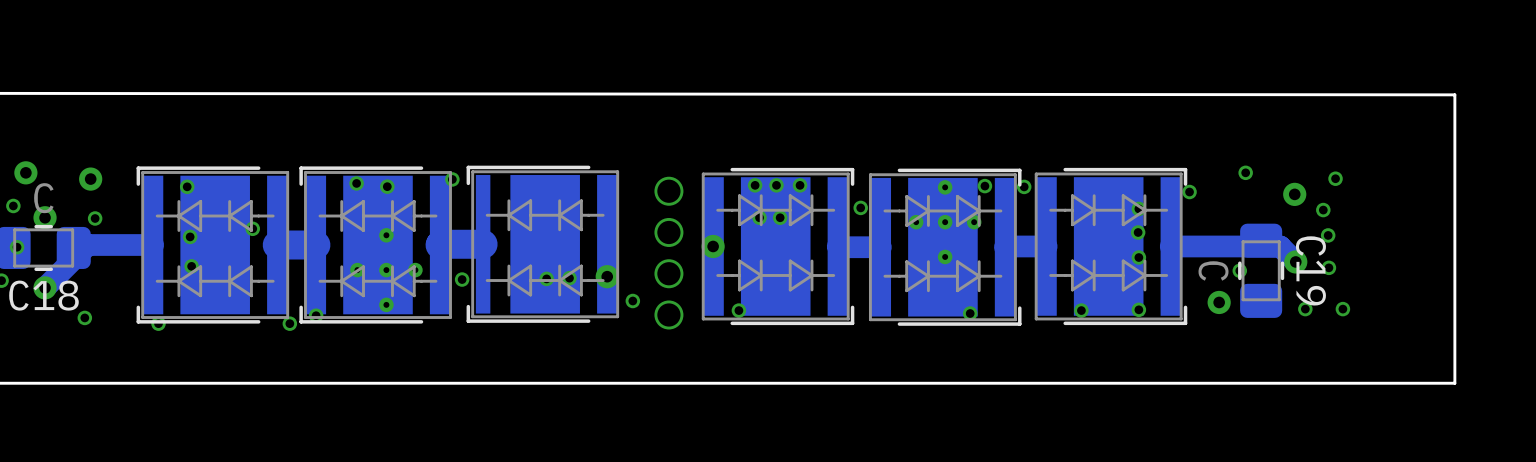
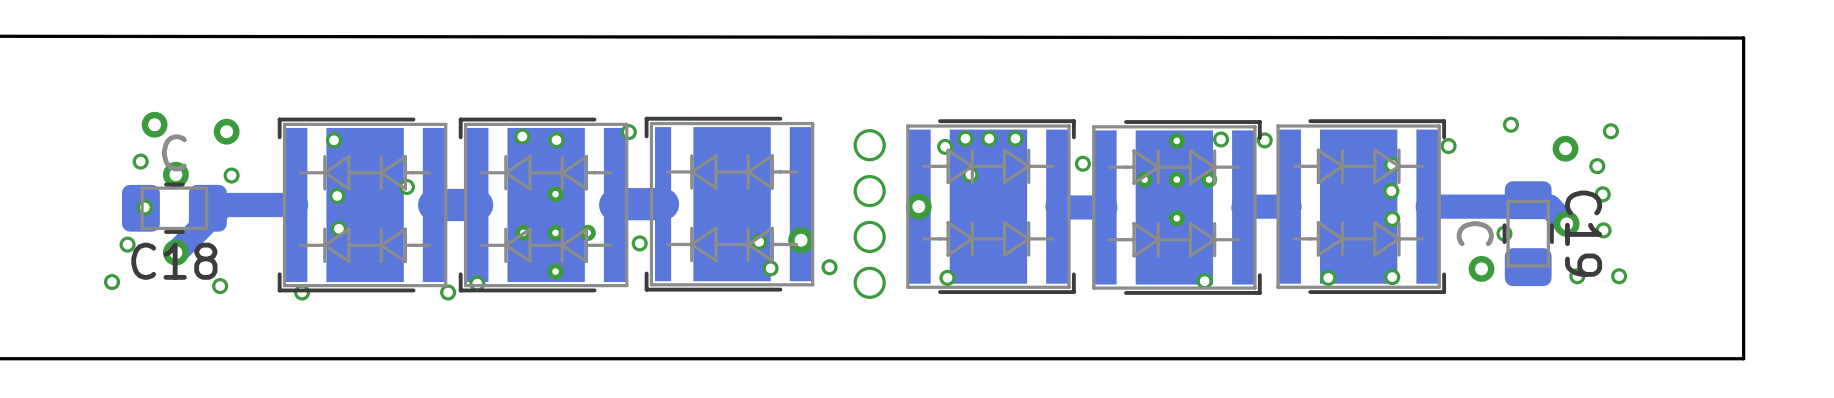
via position: (780, 217) -> (945, 146)
via position: (546, 278) -> (770, 268)

